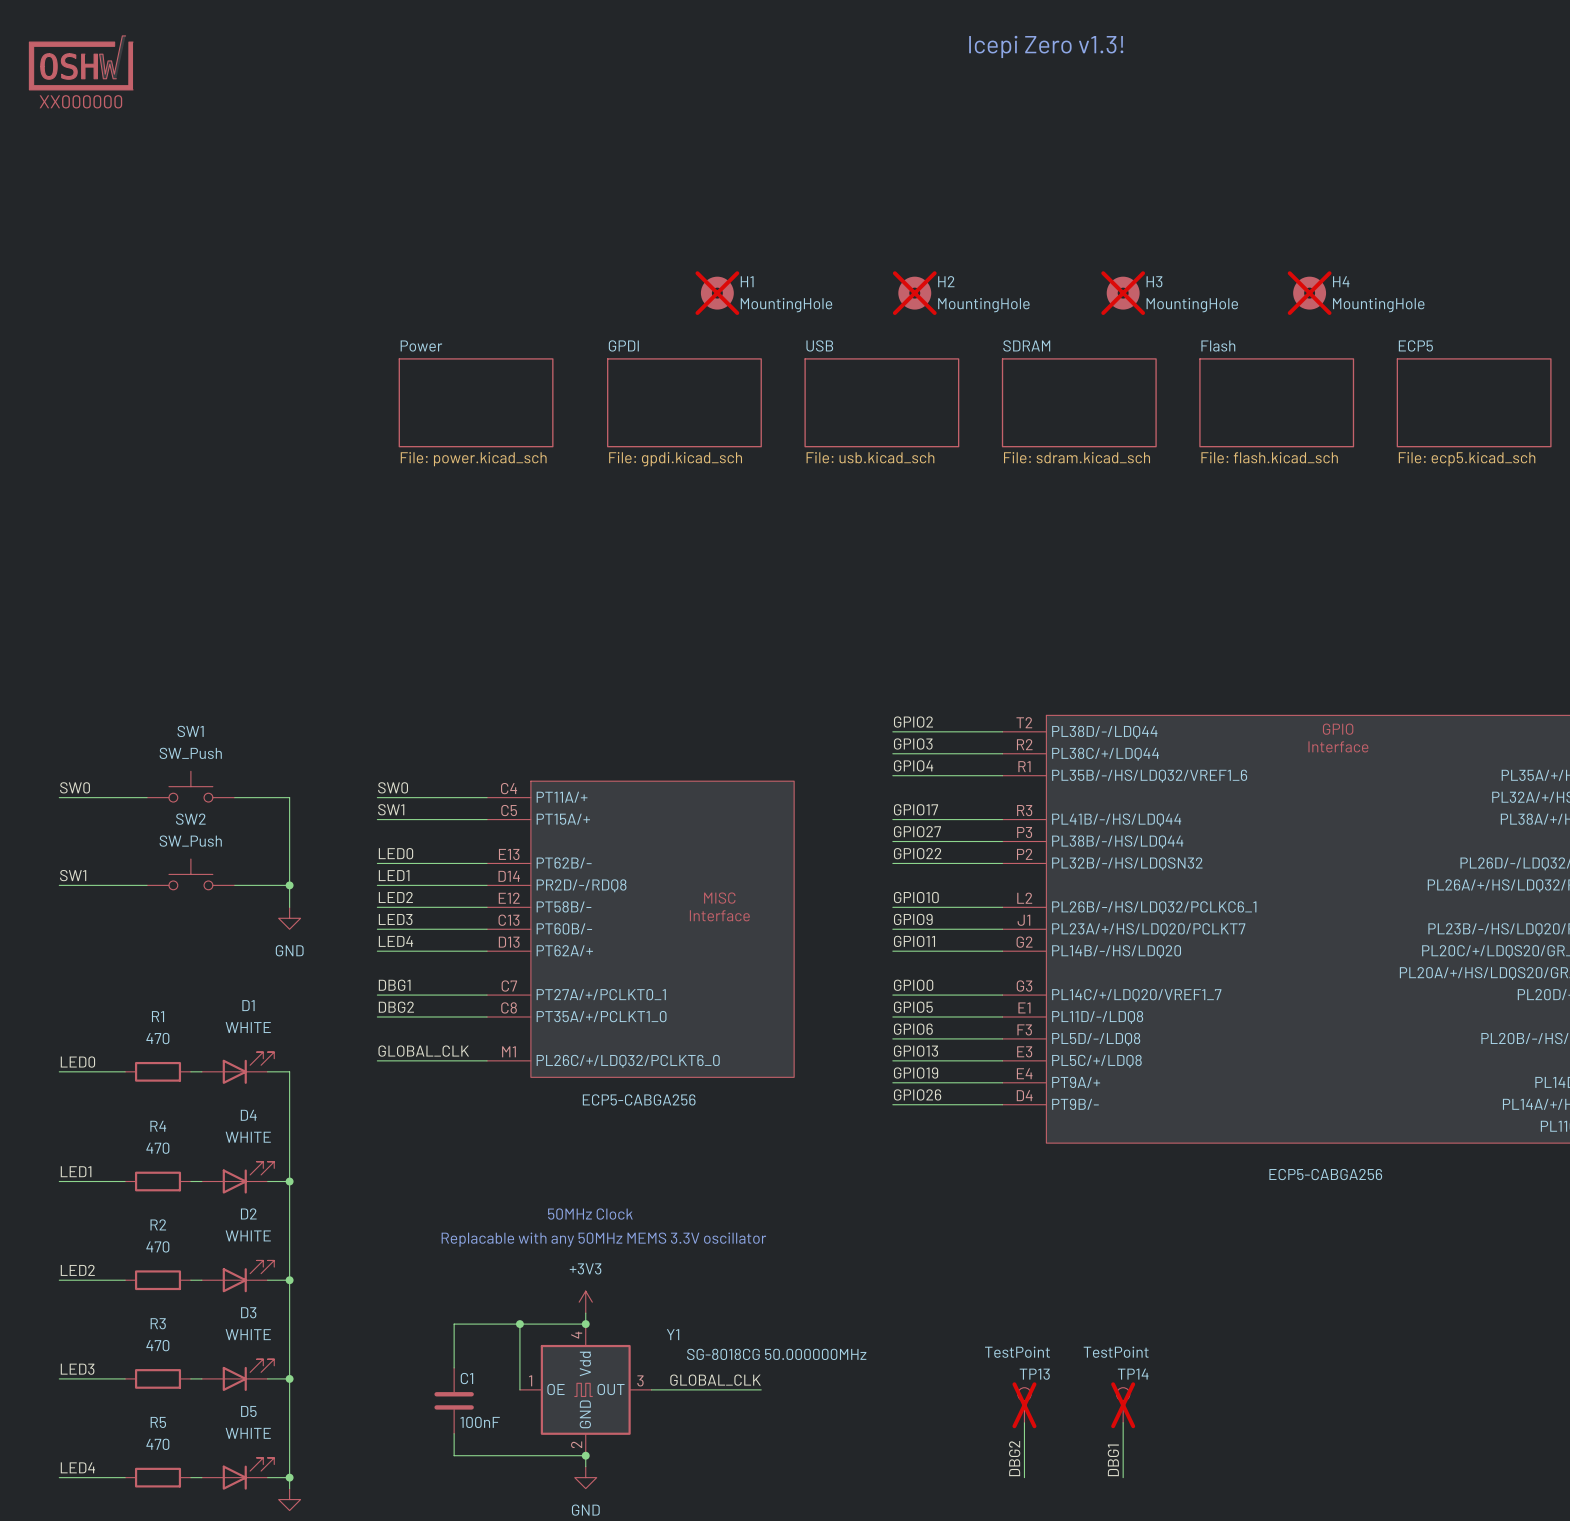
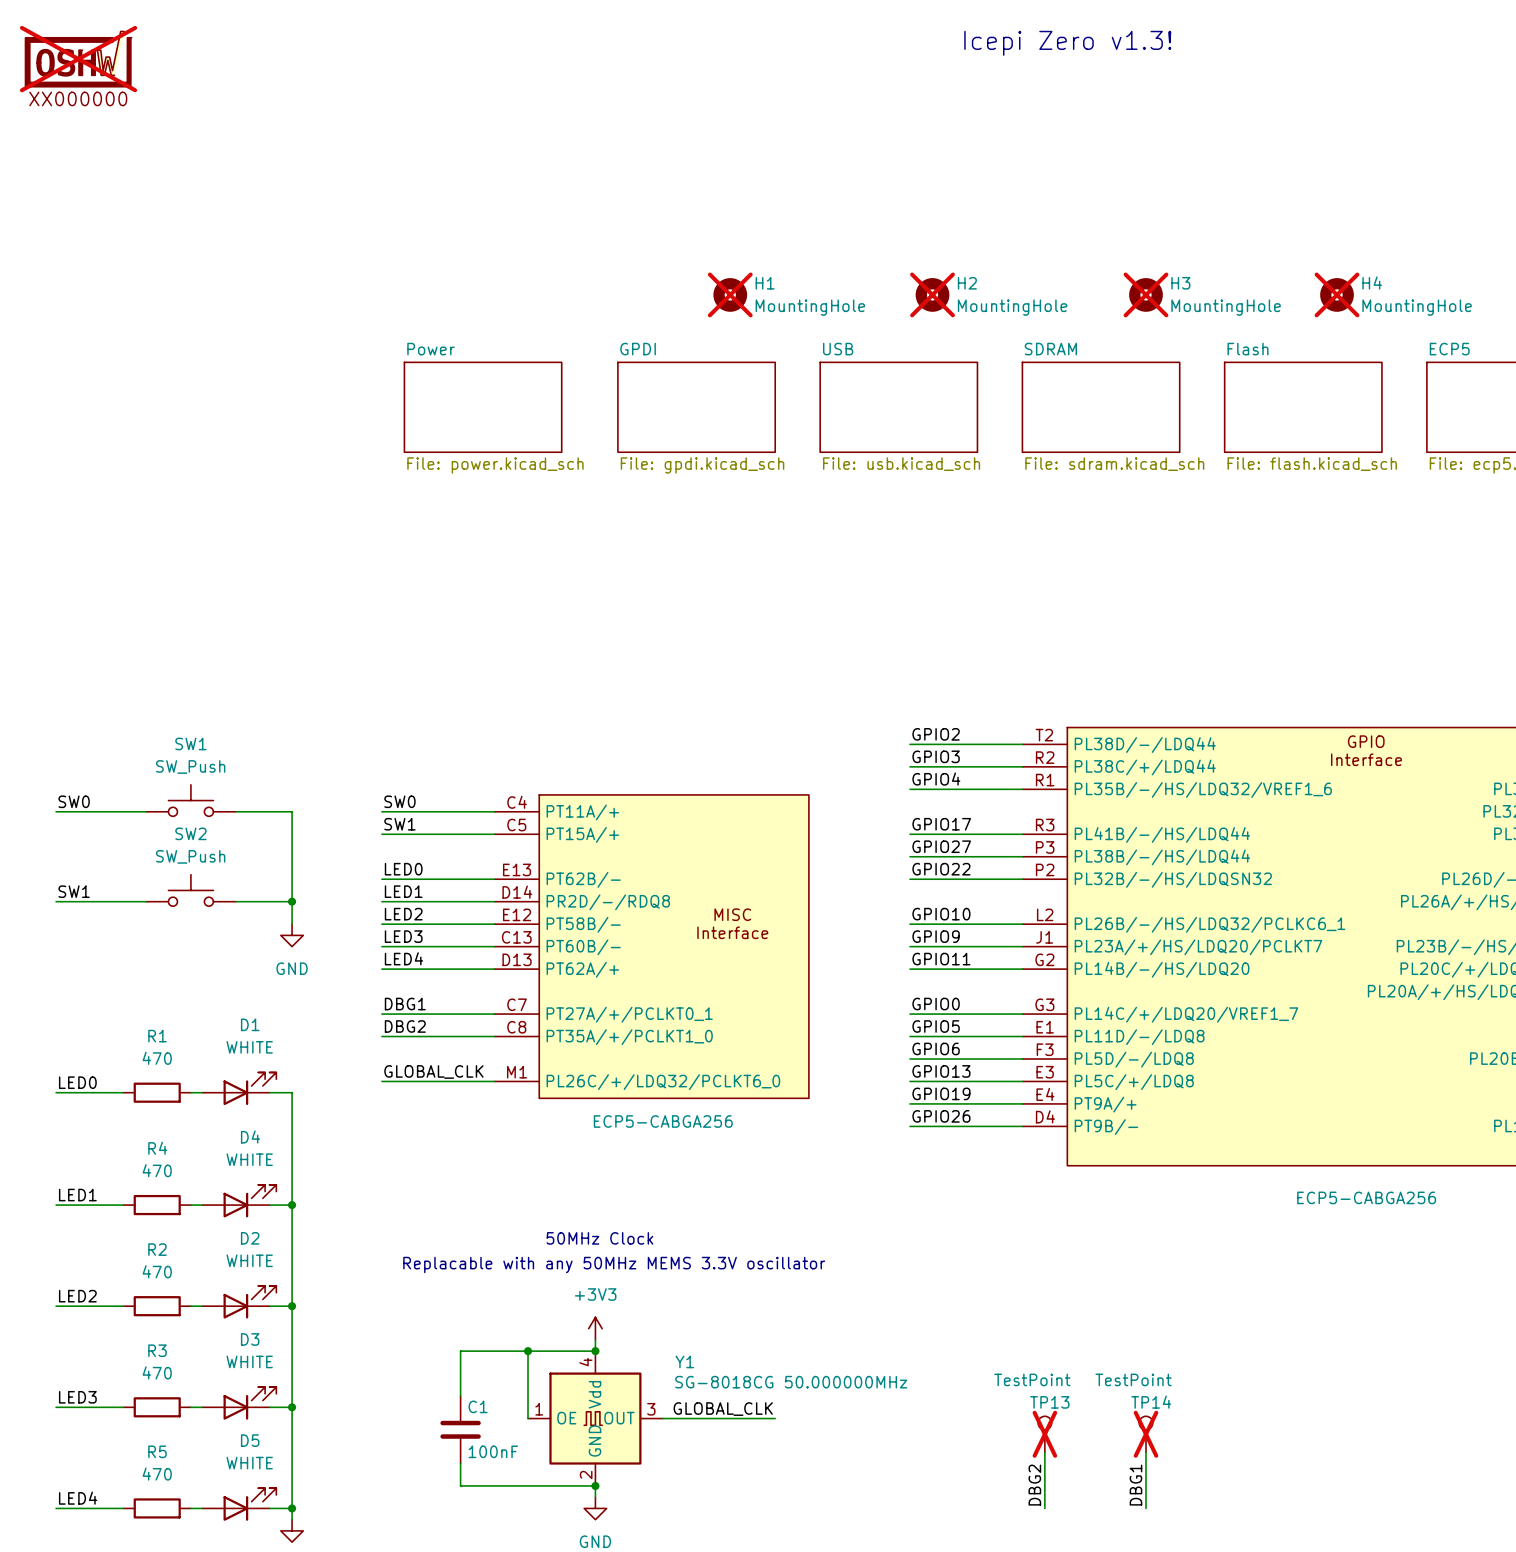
part do-not-place cross: none -> (78, 59)

